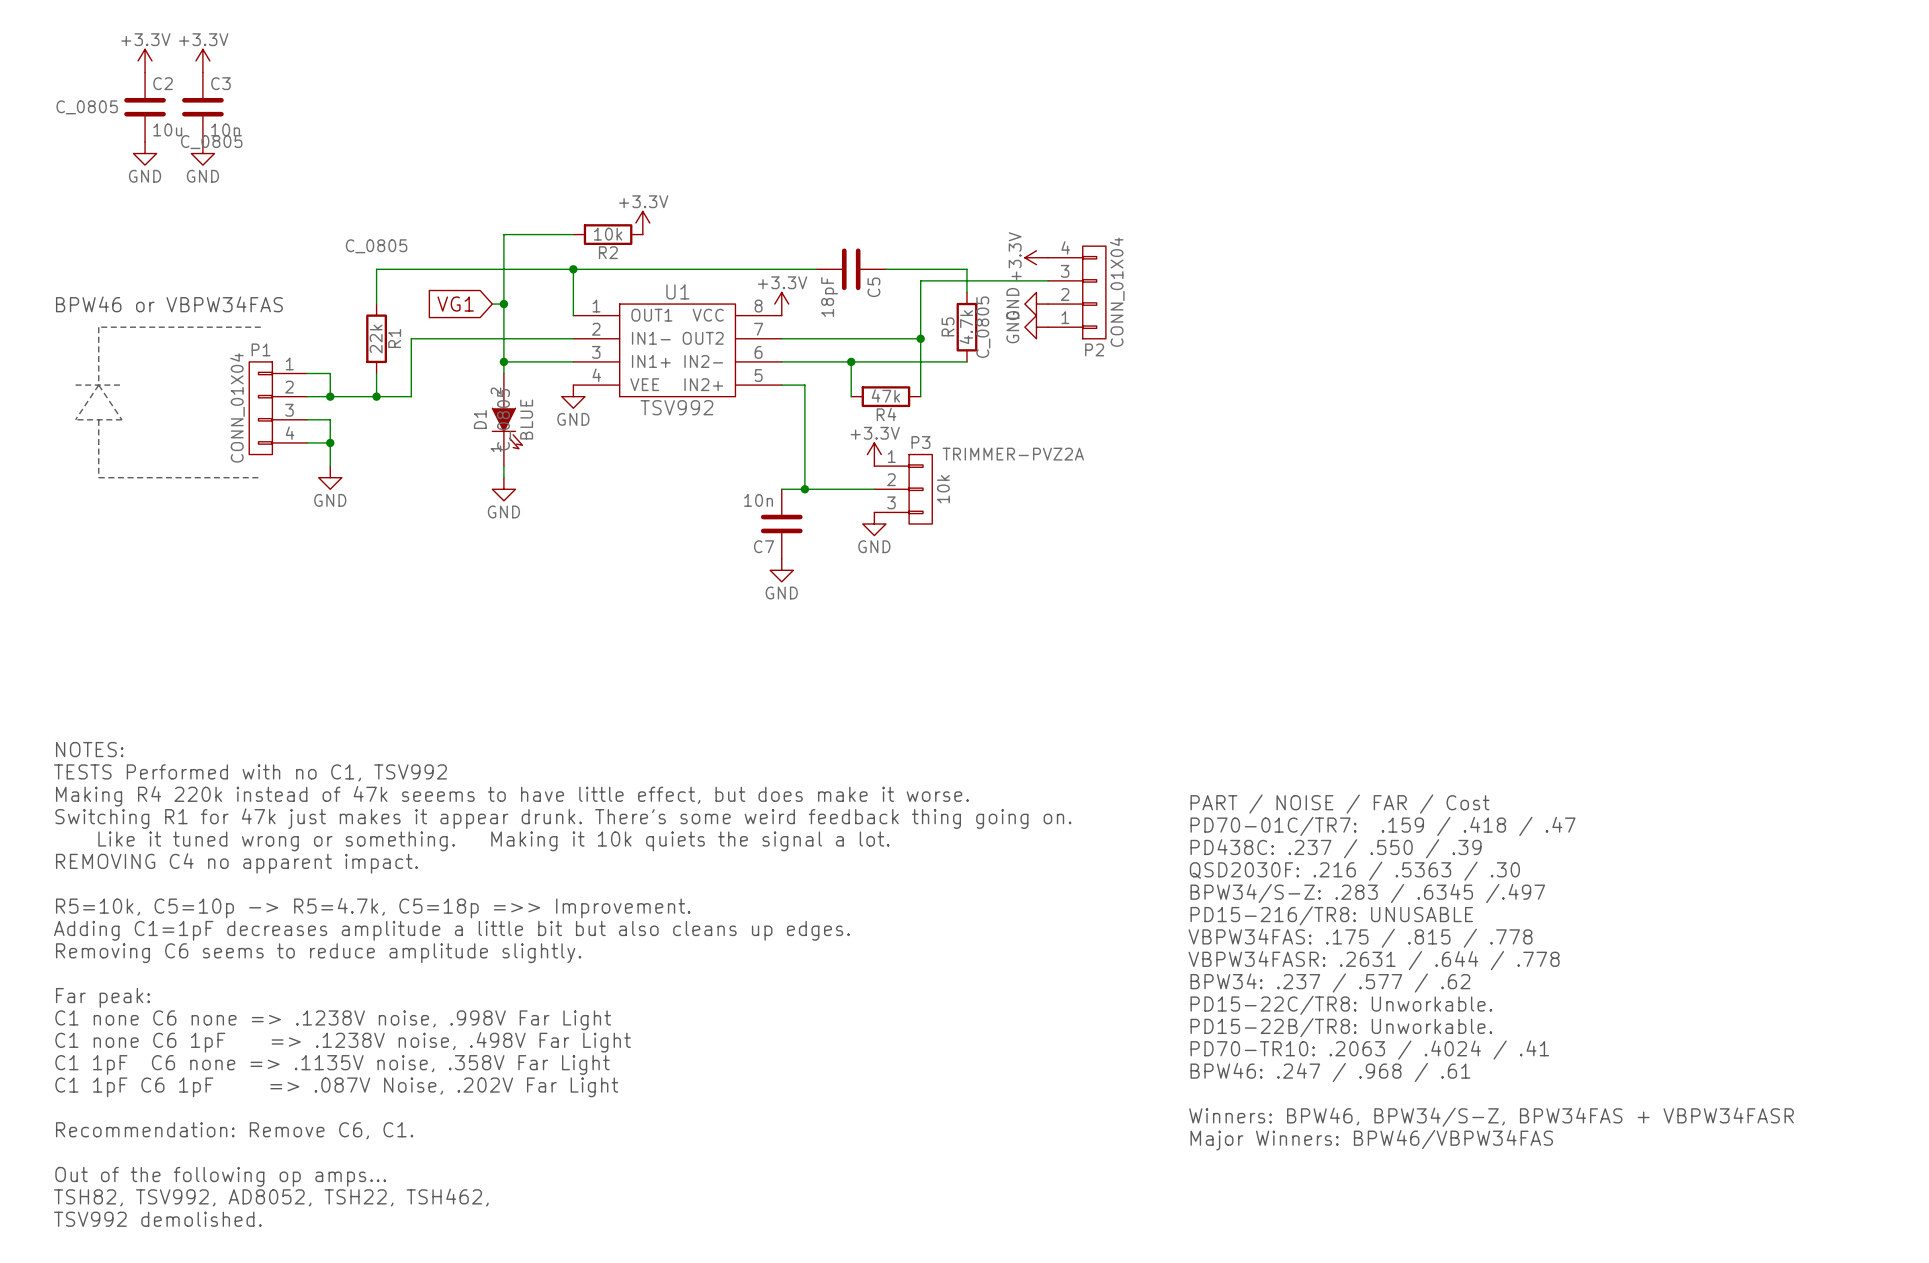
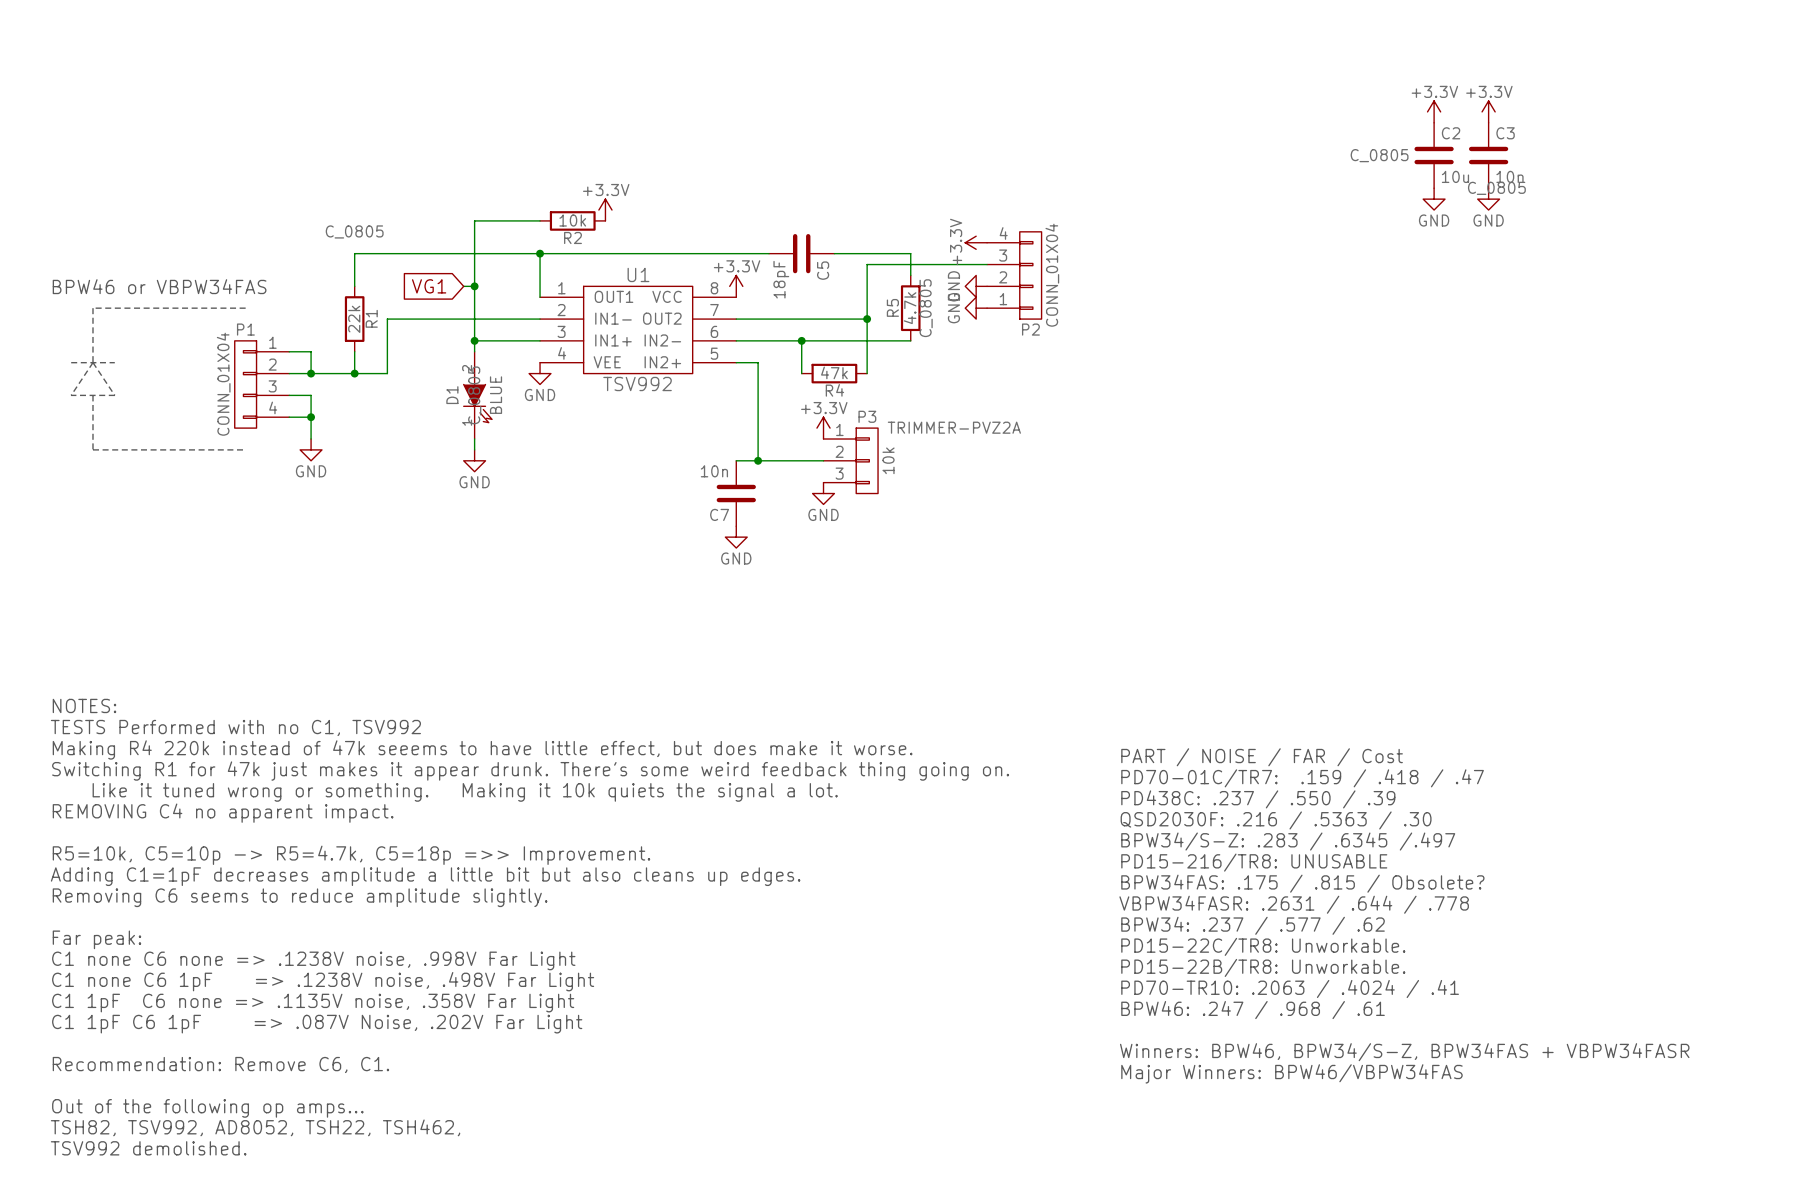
power symbol: +3.3V (145, 60) -> none
power symbol: +3.3V (202, 60) -> none
C2 position: (145, 107) -> (1434, 155)
C3 position: (202, 107) -> (1488, 155)
power symbol: none -> +3.3V (1434, 111)
power symbol: none -> +3.3V (1488, 111)
power symbol: GND (145, 153) -> none
power symbol: GND (202, 153) -> none
power symbol: none -> GND (1434, 199)
power symbol: none -> GND (1488, 199)
text: VBPW34FAS: .175 / .815 / .778 (1360, 938) -> BPW34FAS: .175 / .815 / Obsolete? (1302, 883)

